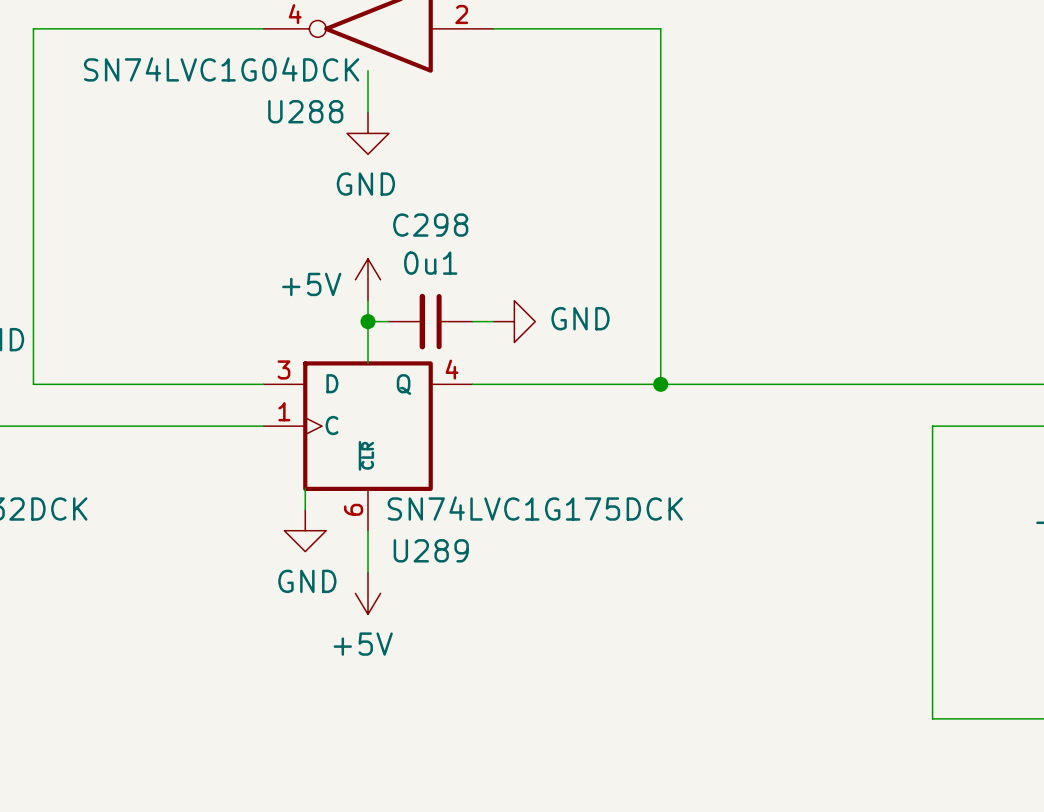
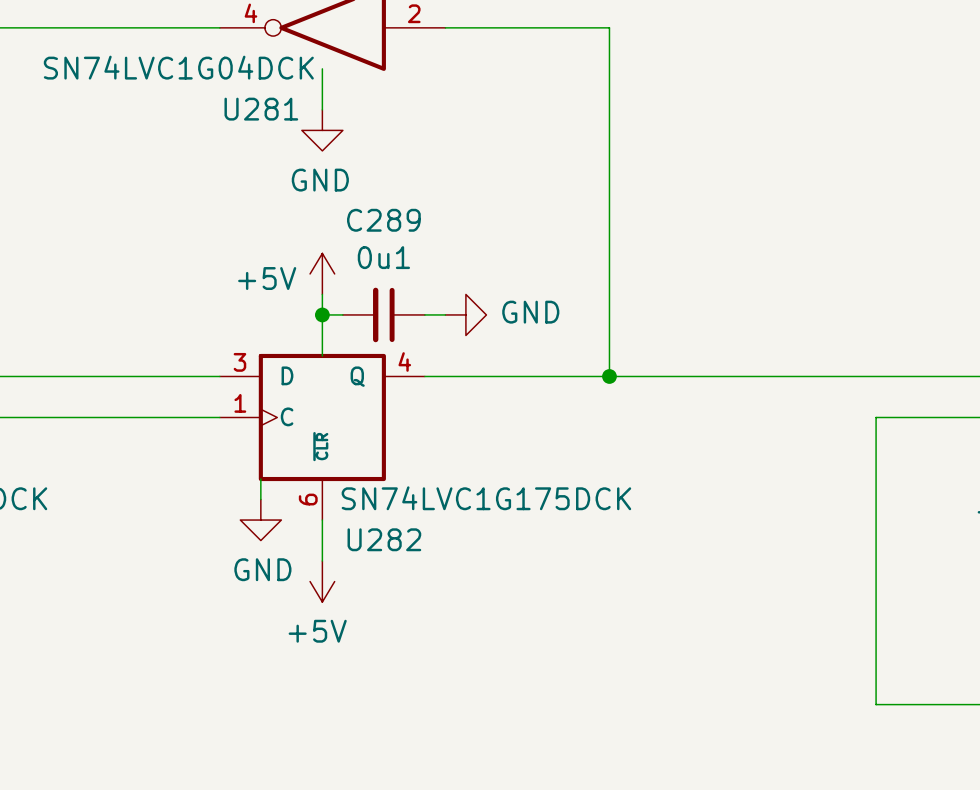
U288 name: U288 (305, 111) -> U281 (261, 109)
C298 name: C298 (430, 225) -> C289 (383, 220)
U289 name: U289 (431, 550) -> U282 (384, 539)

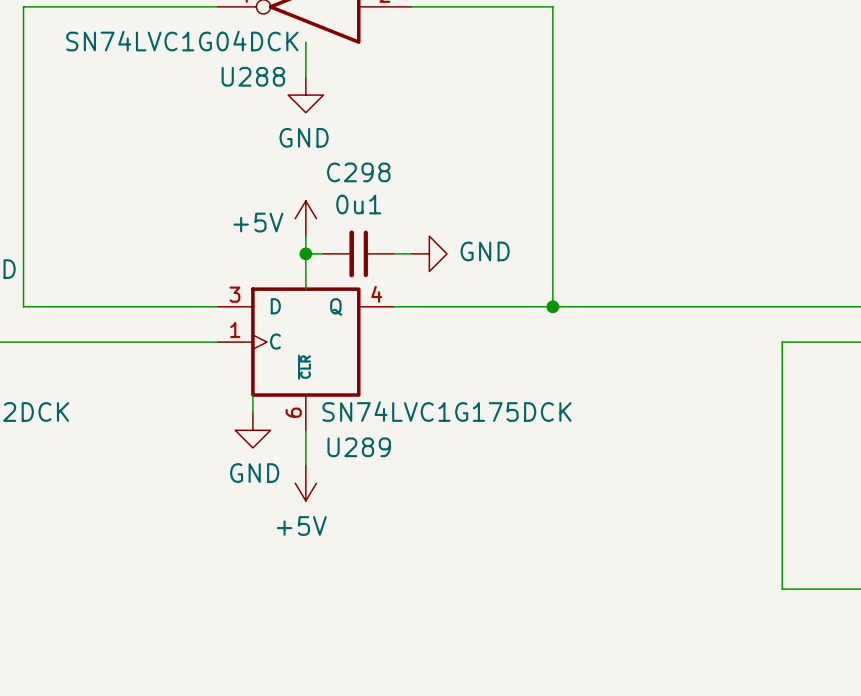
U281 name: U281 (261, 109) -> U288 (253, 76)
C289 name: C289 (383, 220) -> C298 (358, 172)
U282 name: U282 (384, 539) -> U289 (359, 447)

